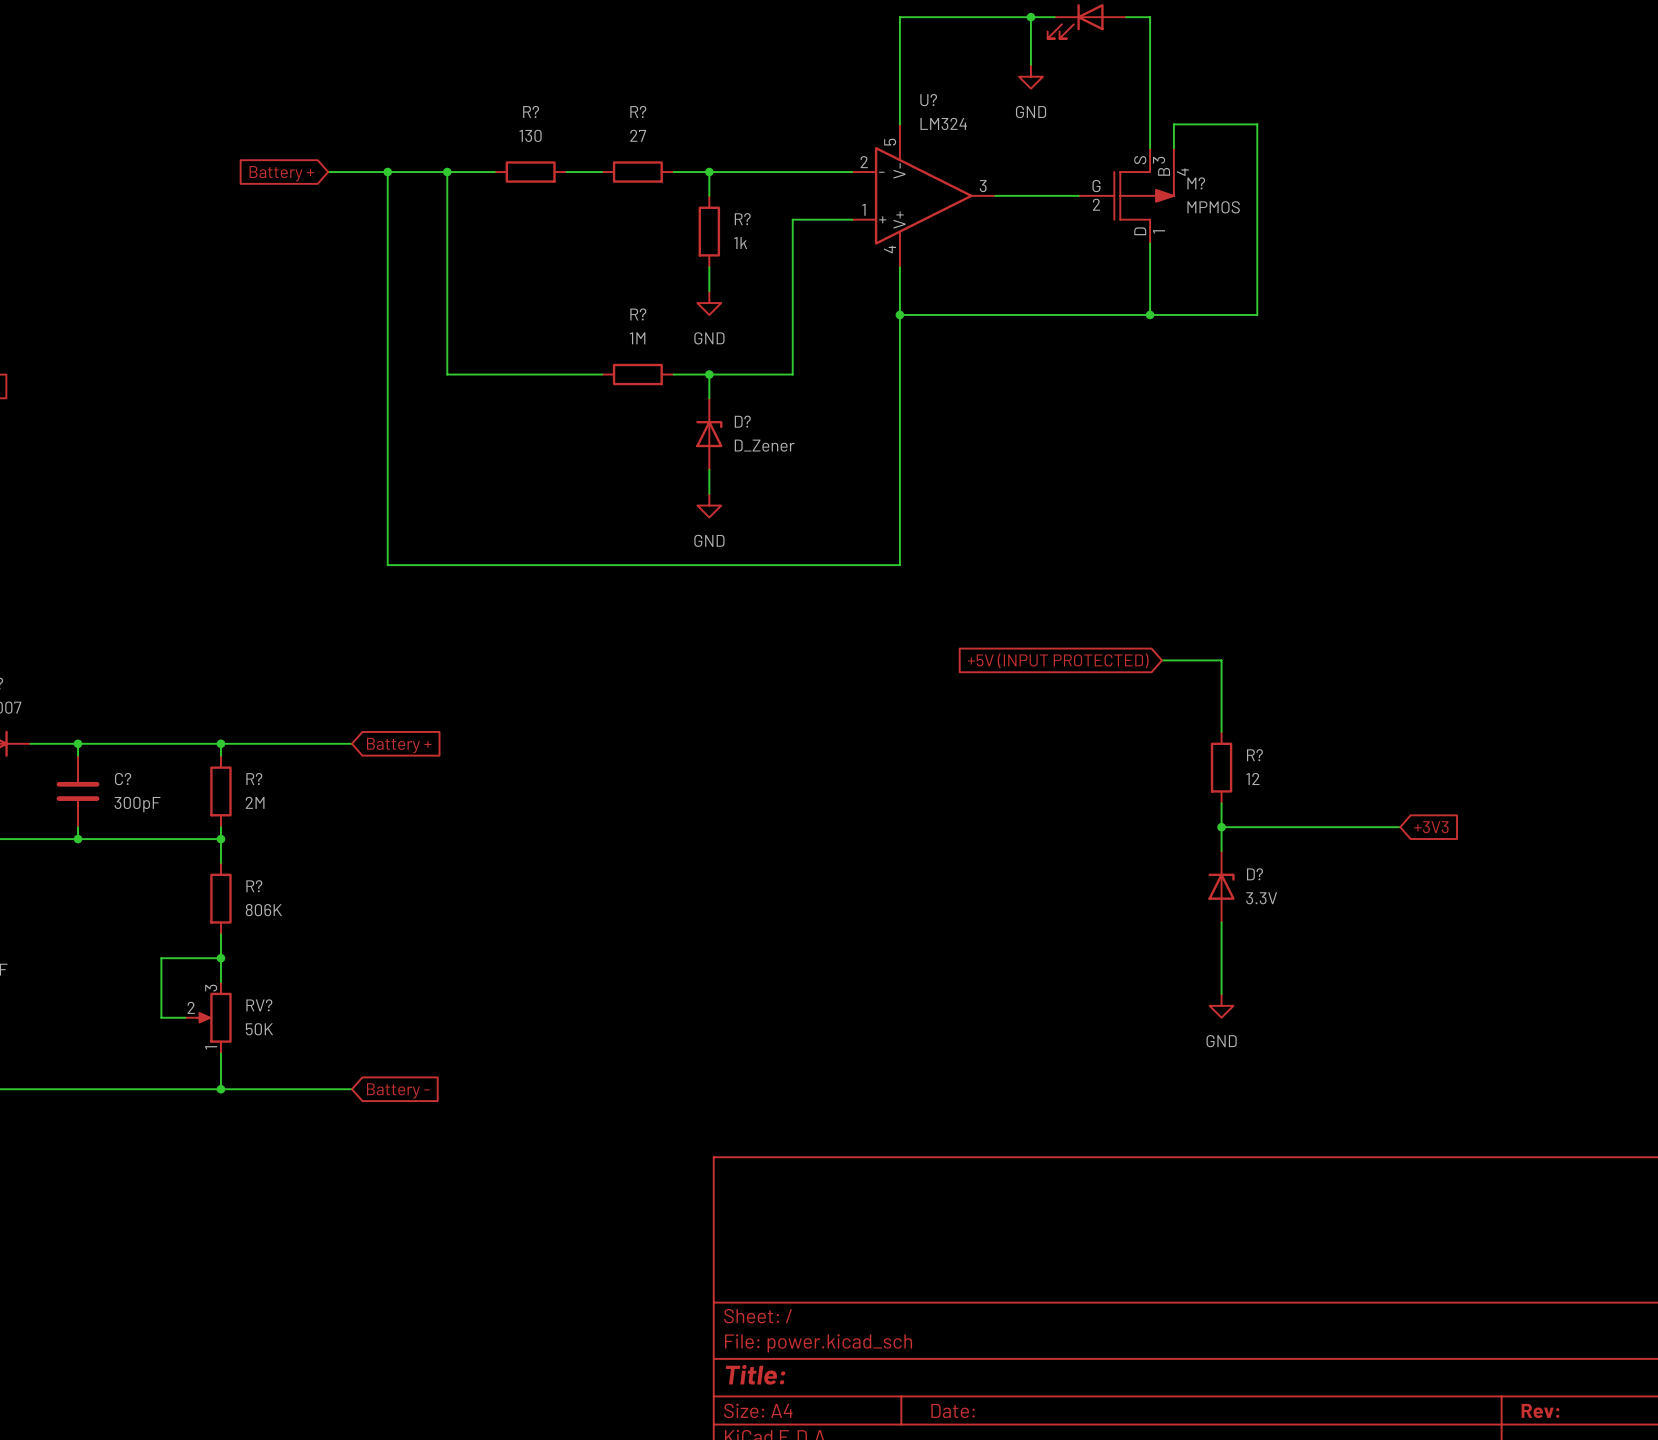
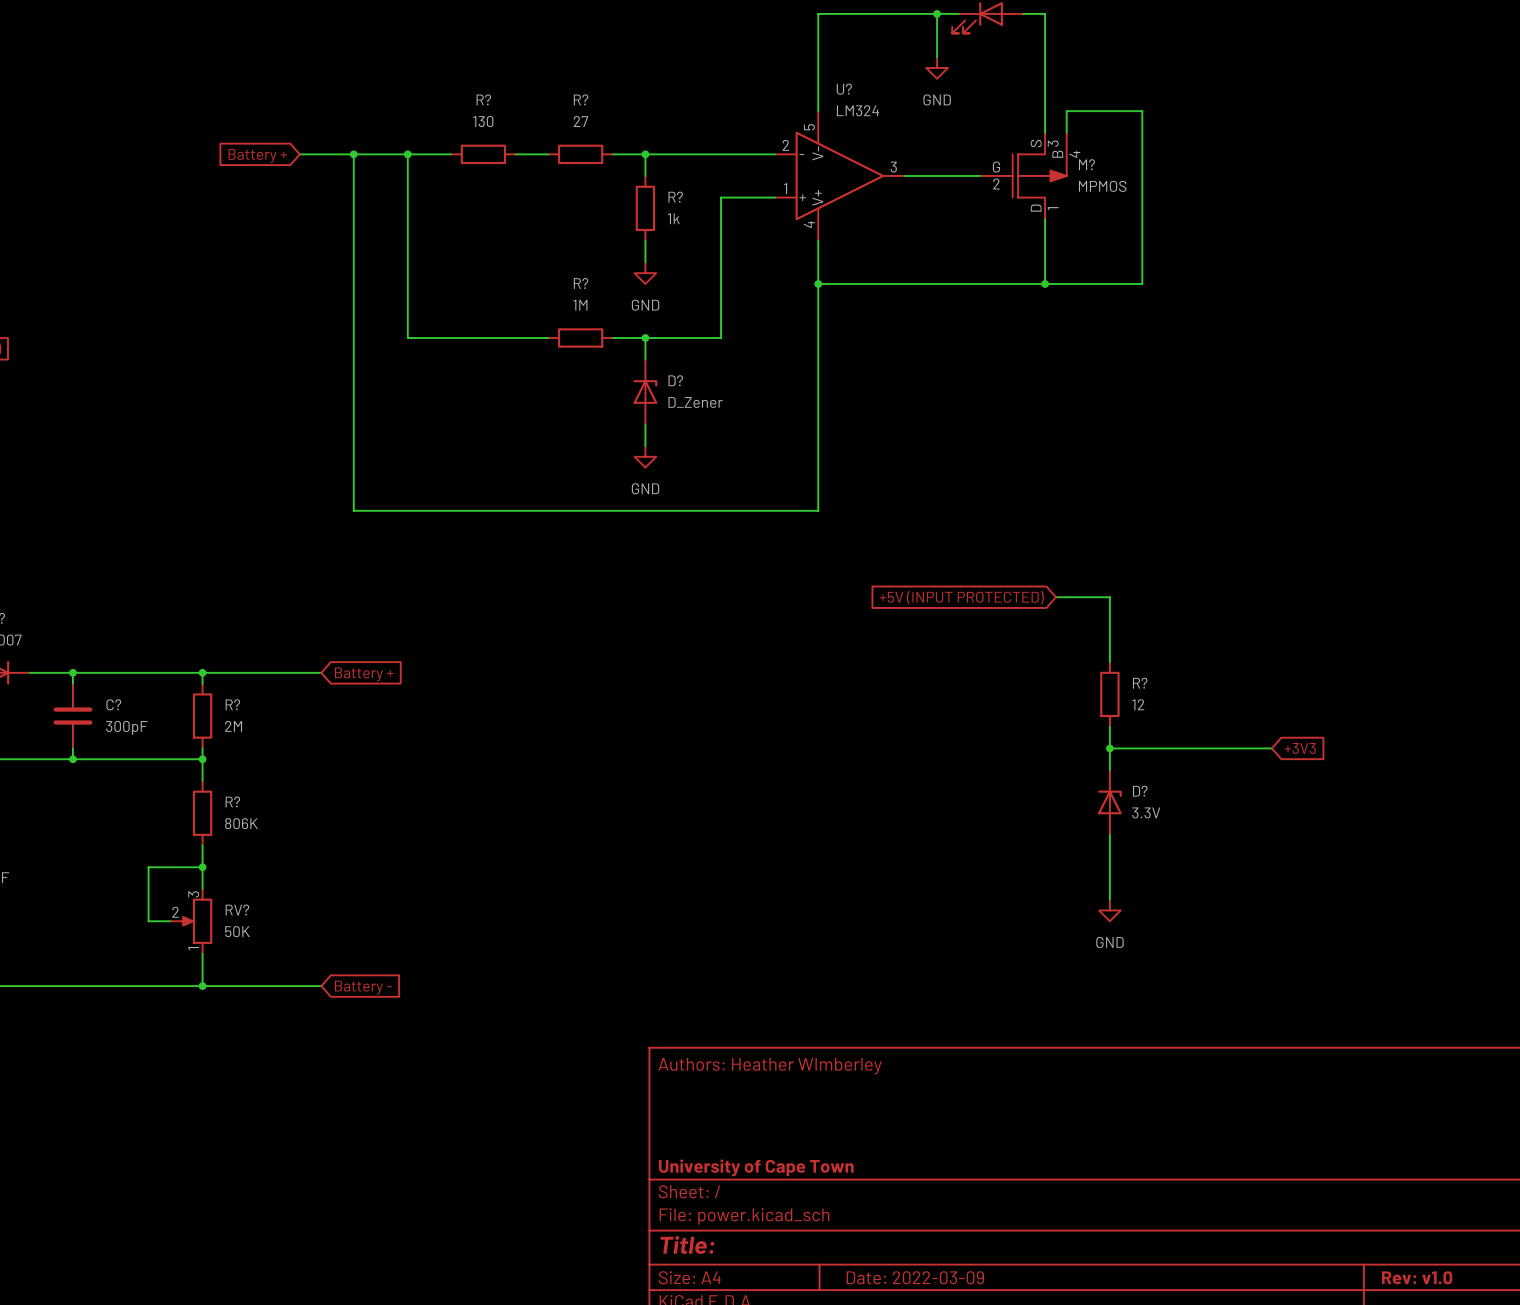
title block: none -> Authors: Heather WImberley (770, 1066)
title block: none -> University of Cape Town (756, 1167)
title block: Date: (953, 1410) -> Date: 2022-03-09 (915, 1277)
title block: Rev: (1540, 1410) -> Rev: v1.0 (1417, 1277)

